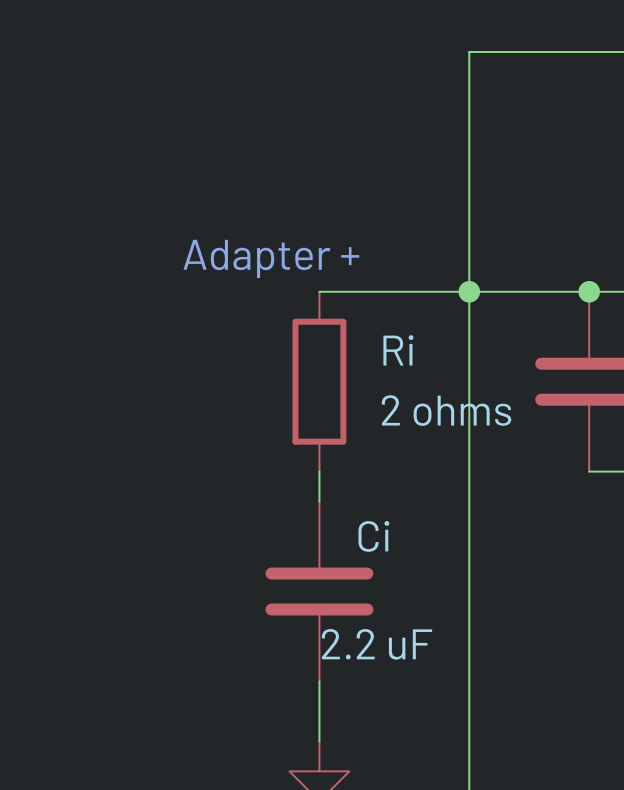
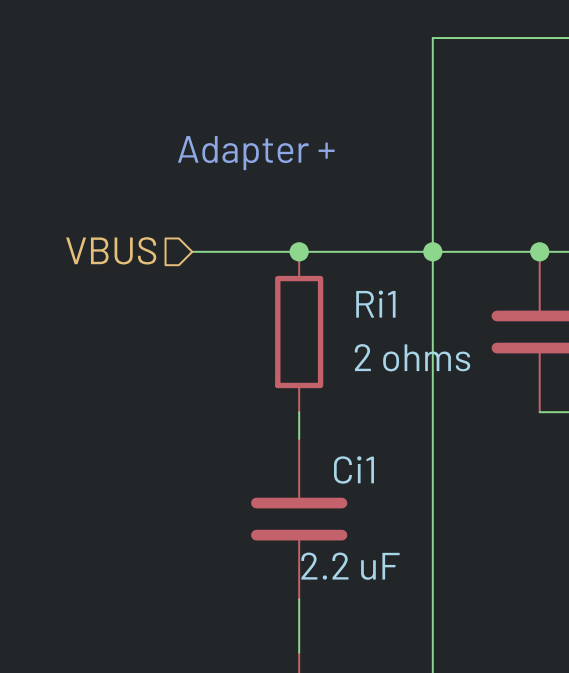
text position: Adapter + (271, 258) -> Adapter + (256, 153)
hierarchical label: none -> VBUS (111, 250)
wire: none -> (192, 251) (299, 251)
junction: none -> (299, 251)
Ri name: Ri (398, 350) -> Ri1 (375, 304)
Ci name: Ci (373, 536) -> Ci1 (353, 469)

